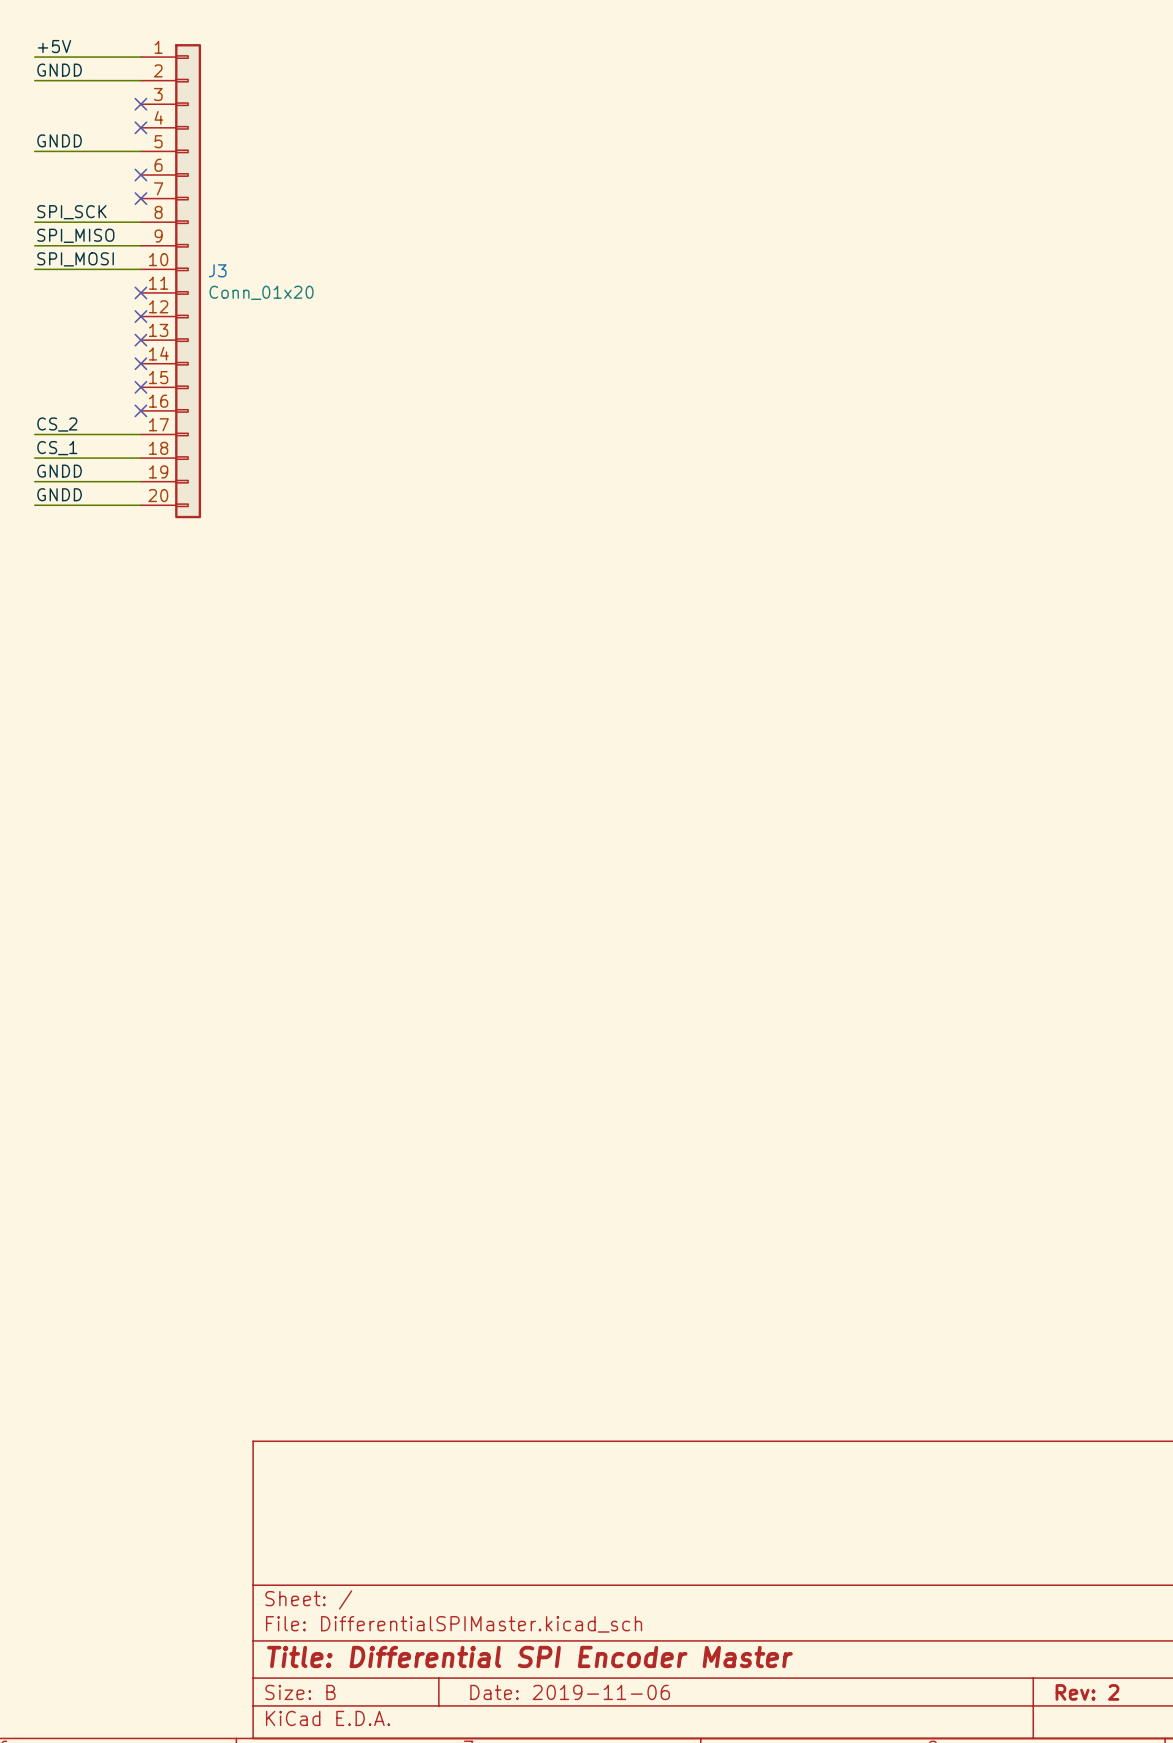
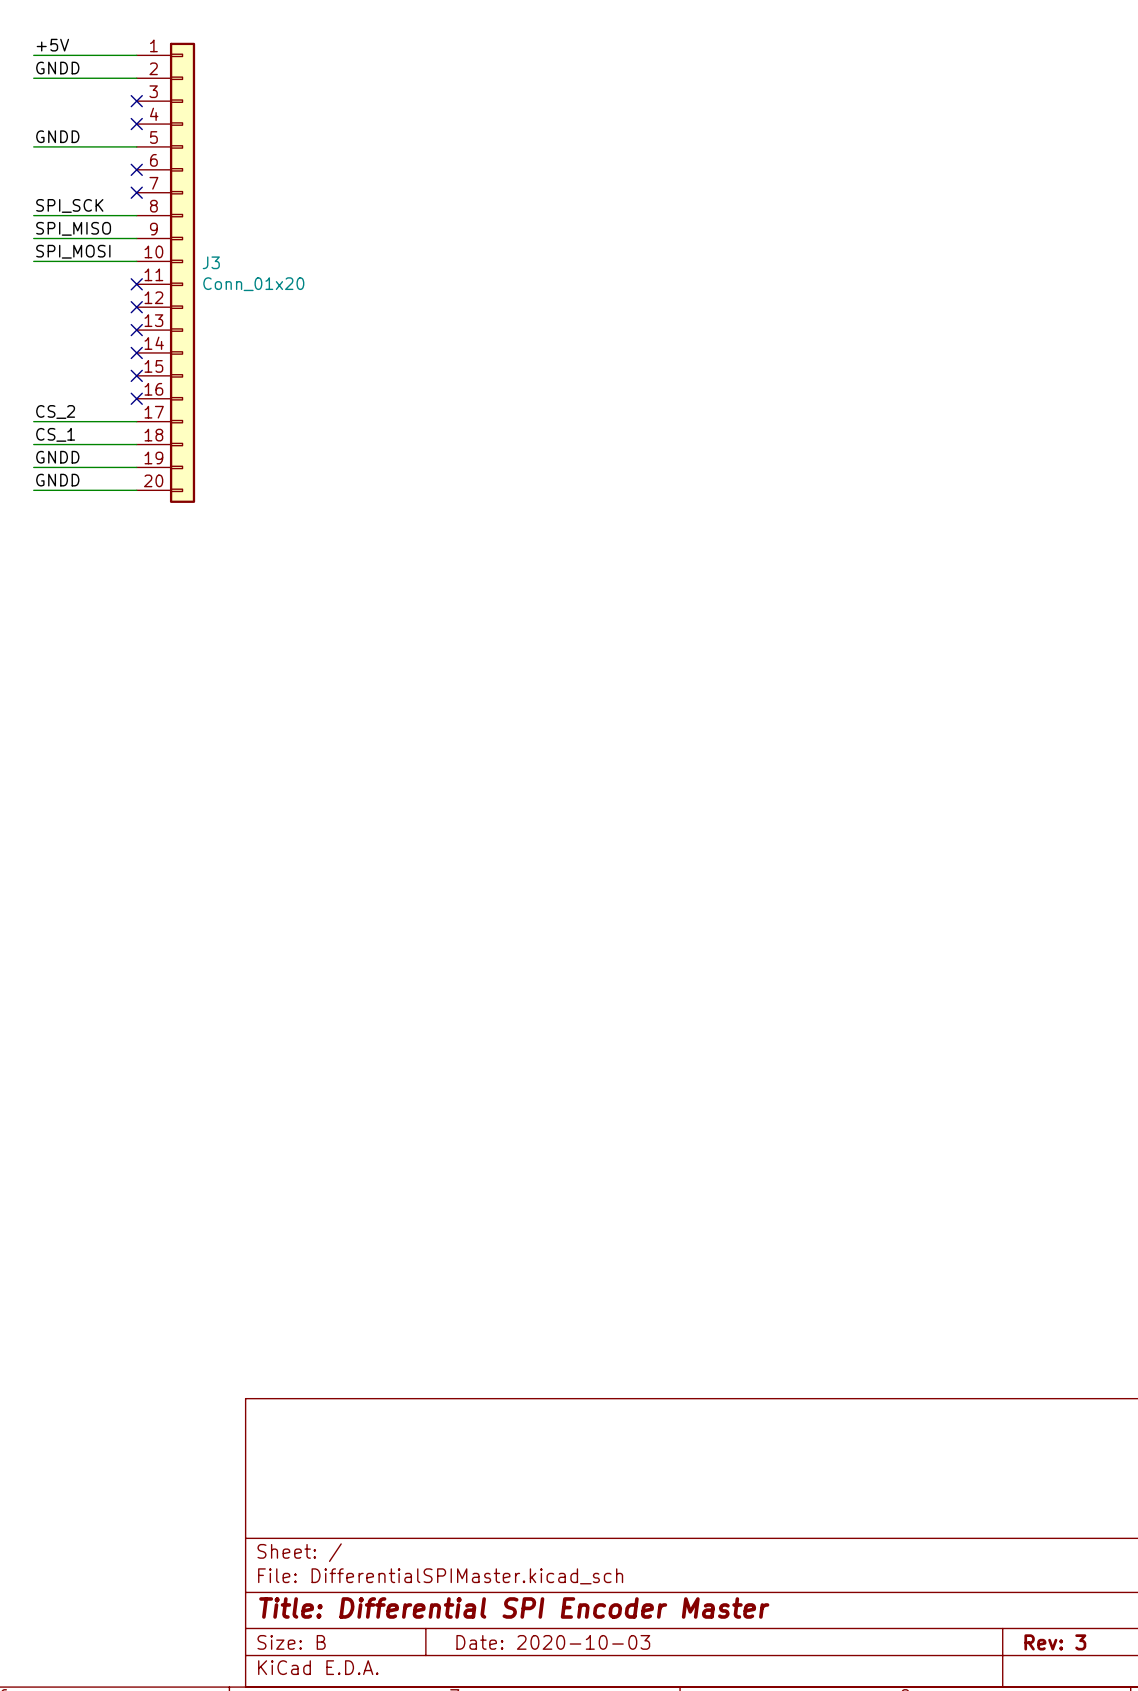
title block: Date: 2019-11-06 (570, 1692) -> Date: 2020-10-03 (553, 1642)
title block: Rev: 2 (1087, 1692) -> Rev: 3 (1055, 1642)

